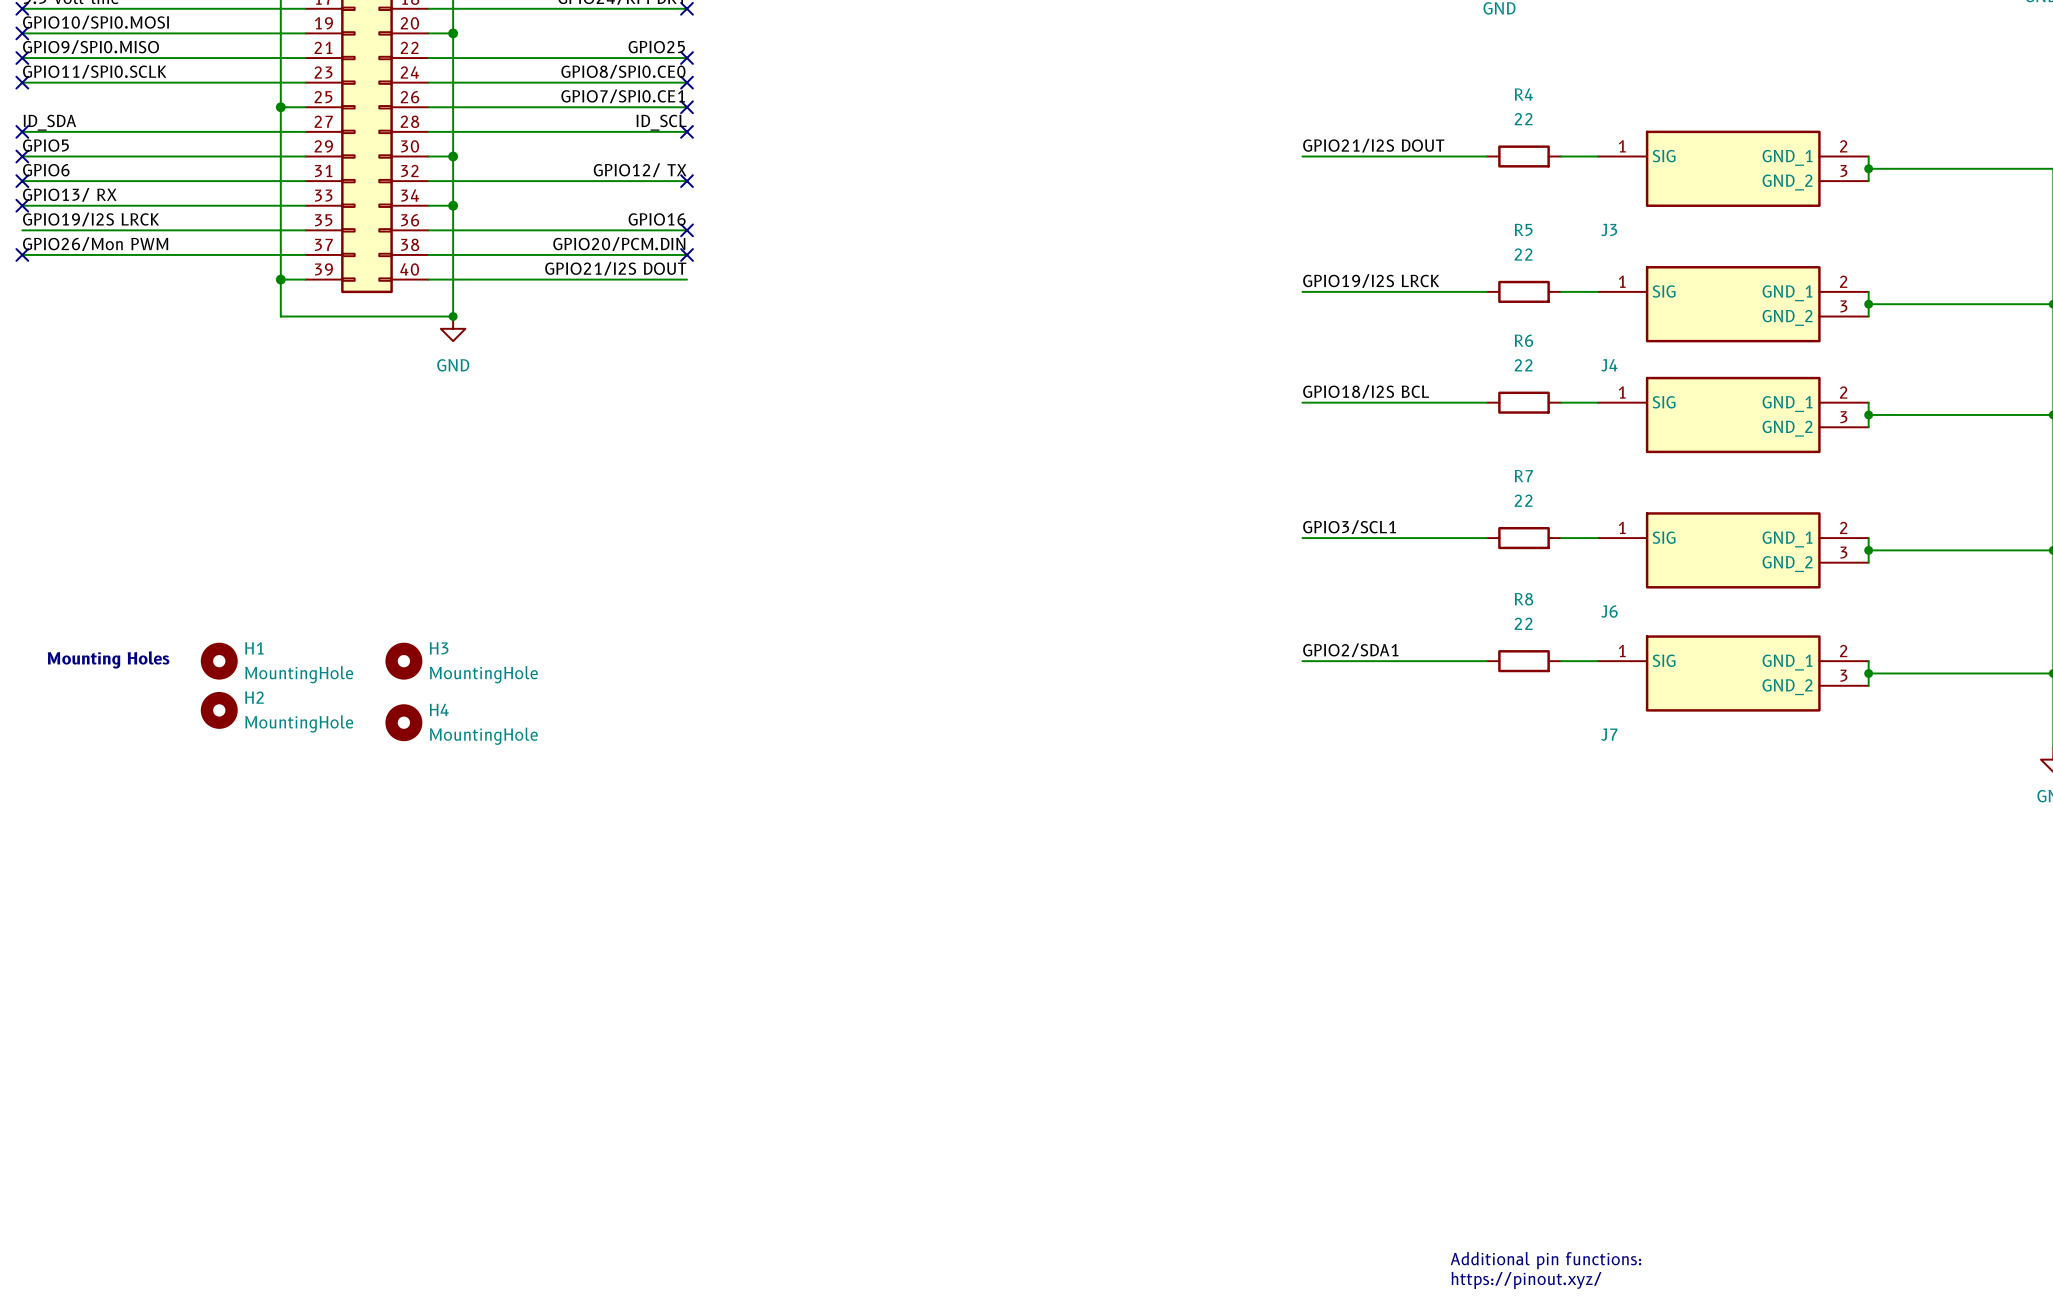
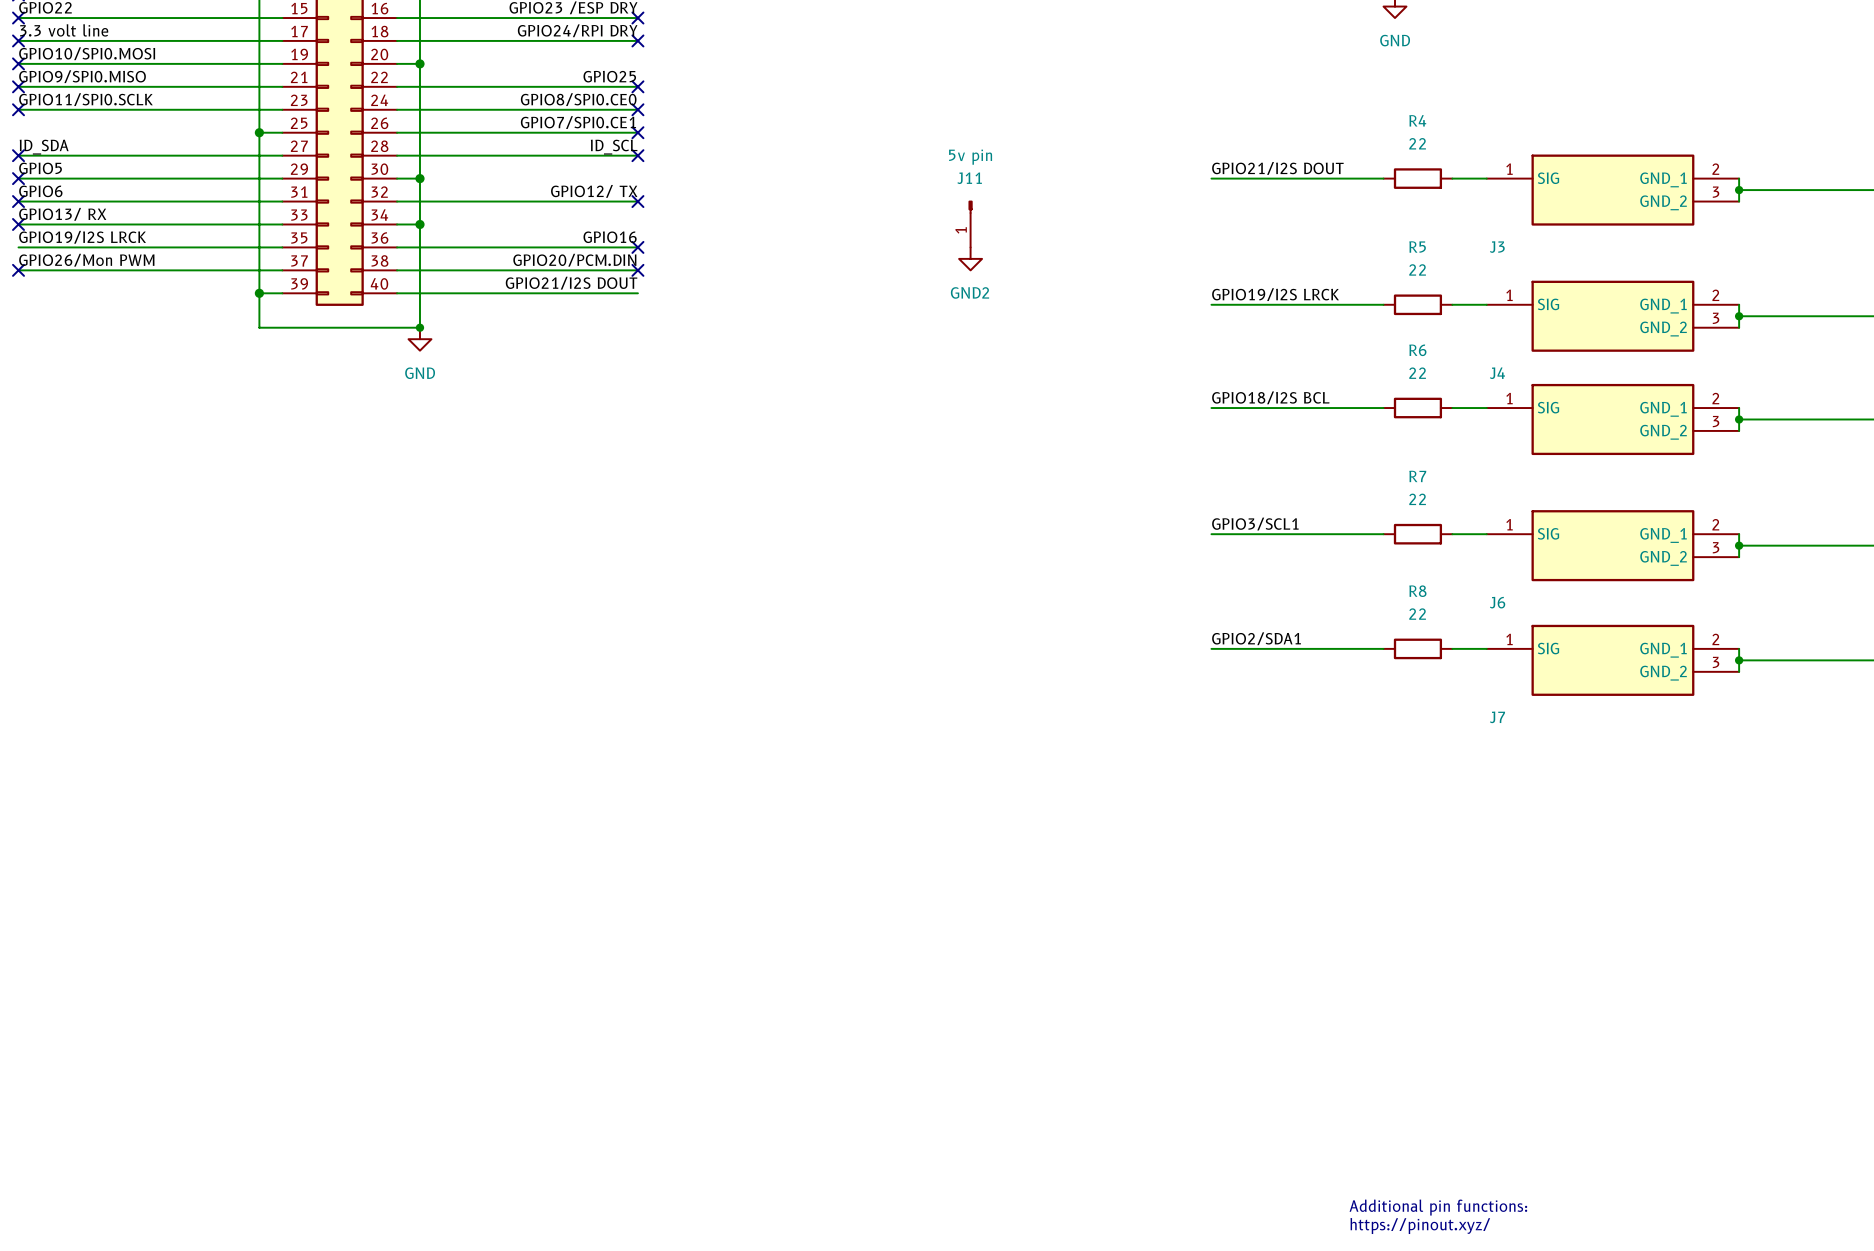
J11: none -> 5v pin (970, 224)
power symbol: none -> GND2 (970, 258)
text: Mounting Holes (108, 659) -> none
H1: MountingHole (219, 661) -> none
H3: MountingHole (403, 661) -> none
H2: MountingHole (219, 710) -> none
H4: MountingHole (403, 722) -> none

